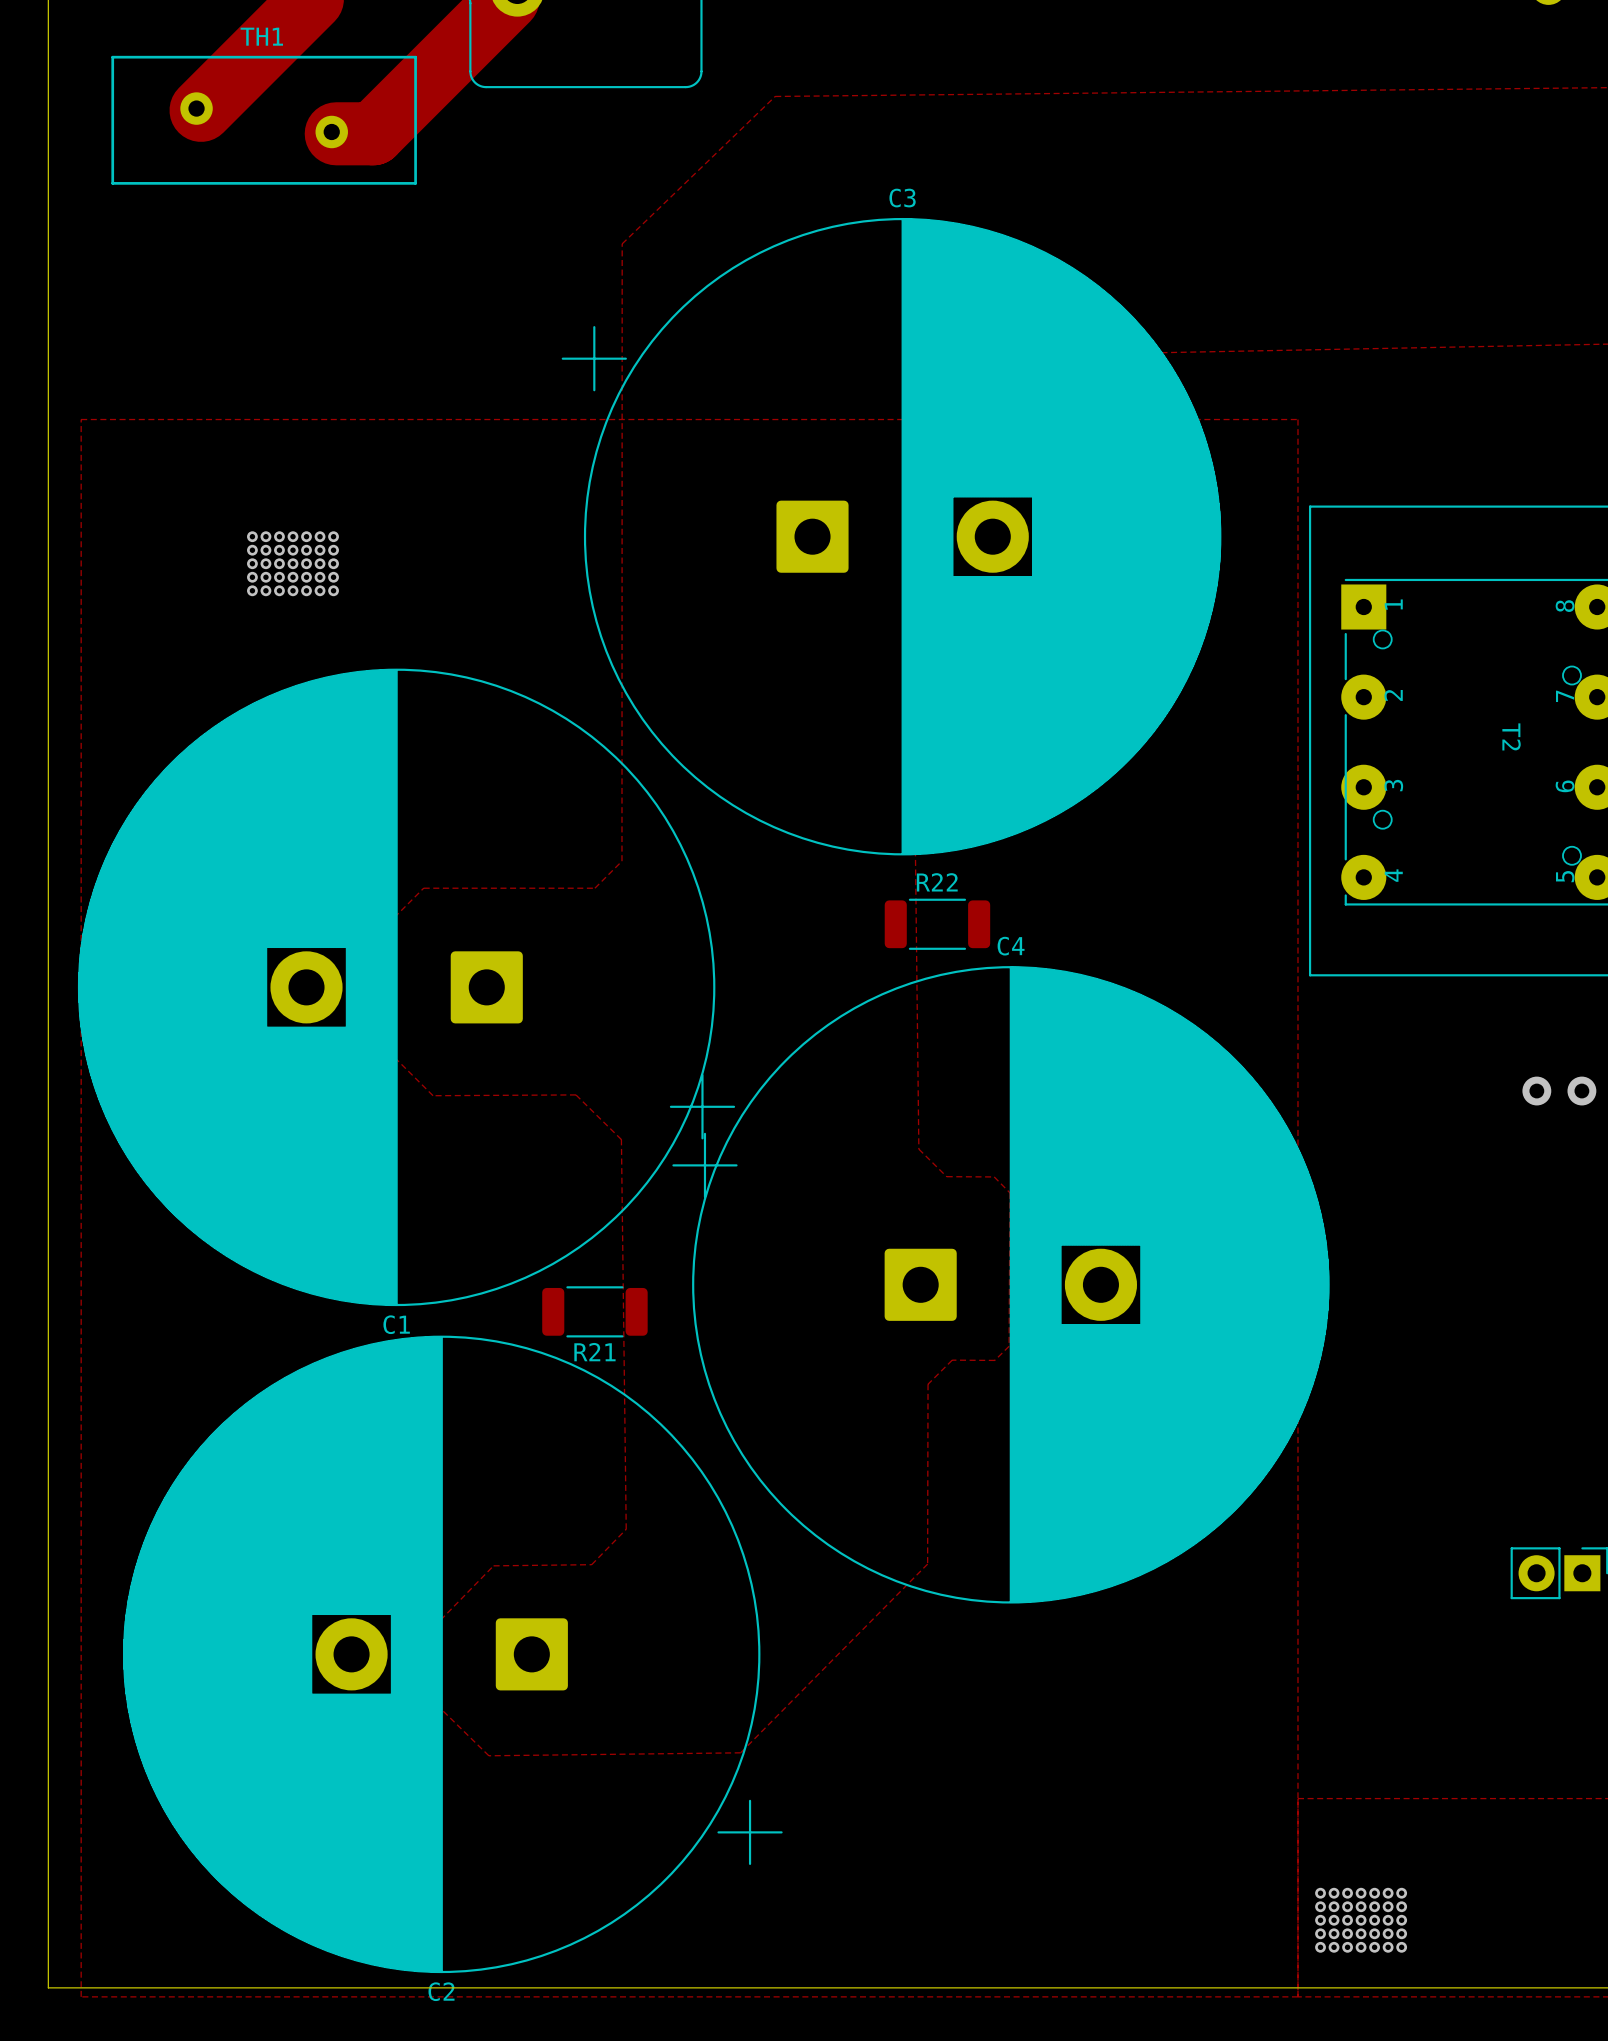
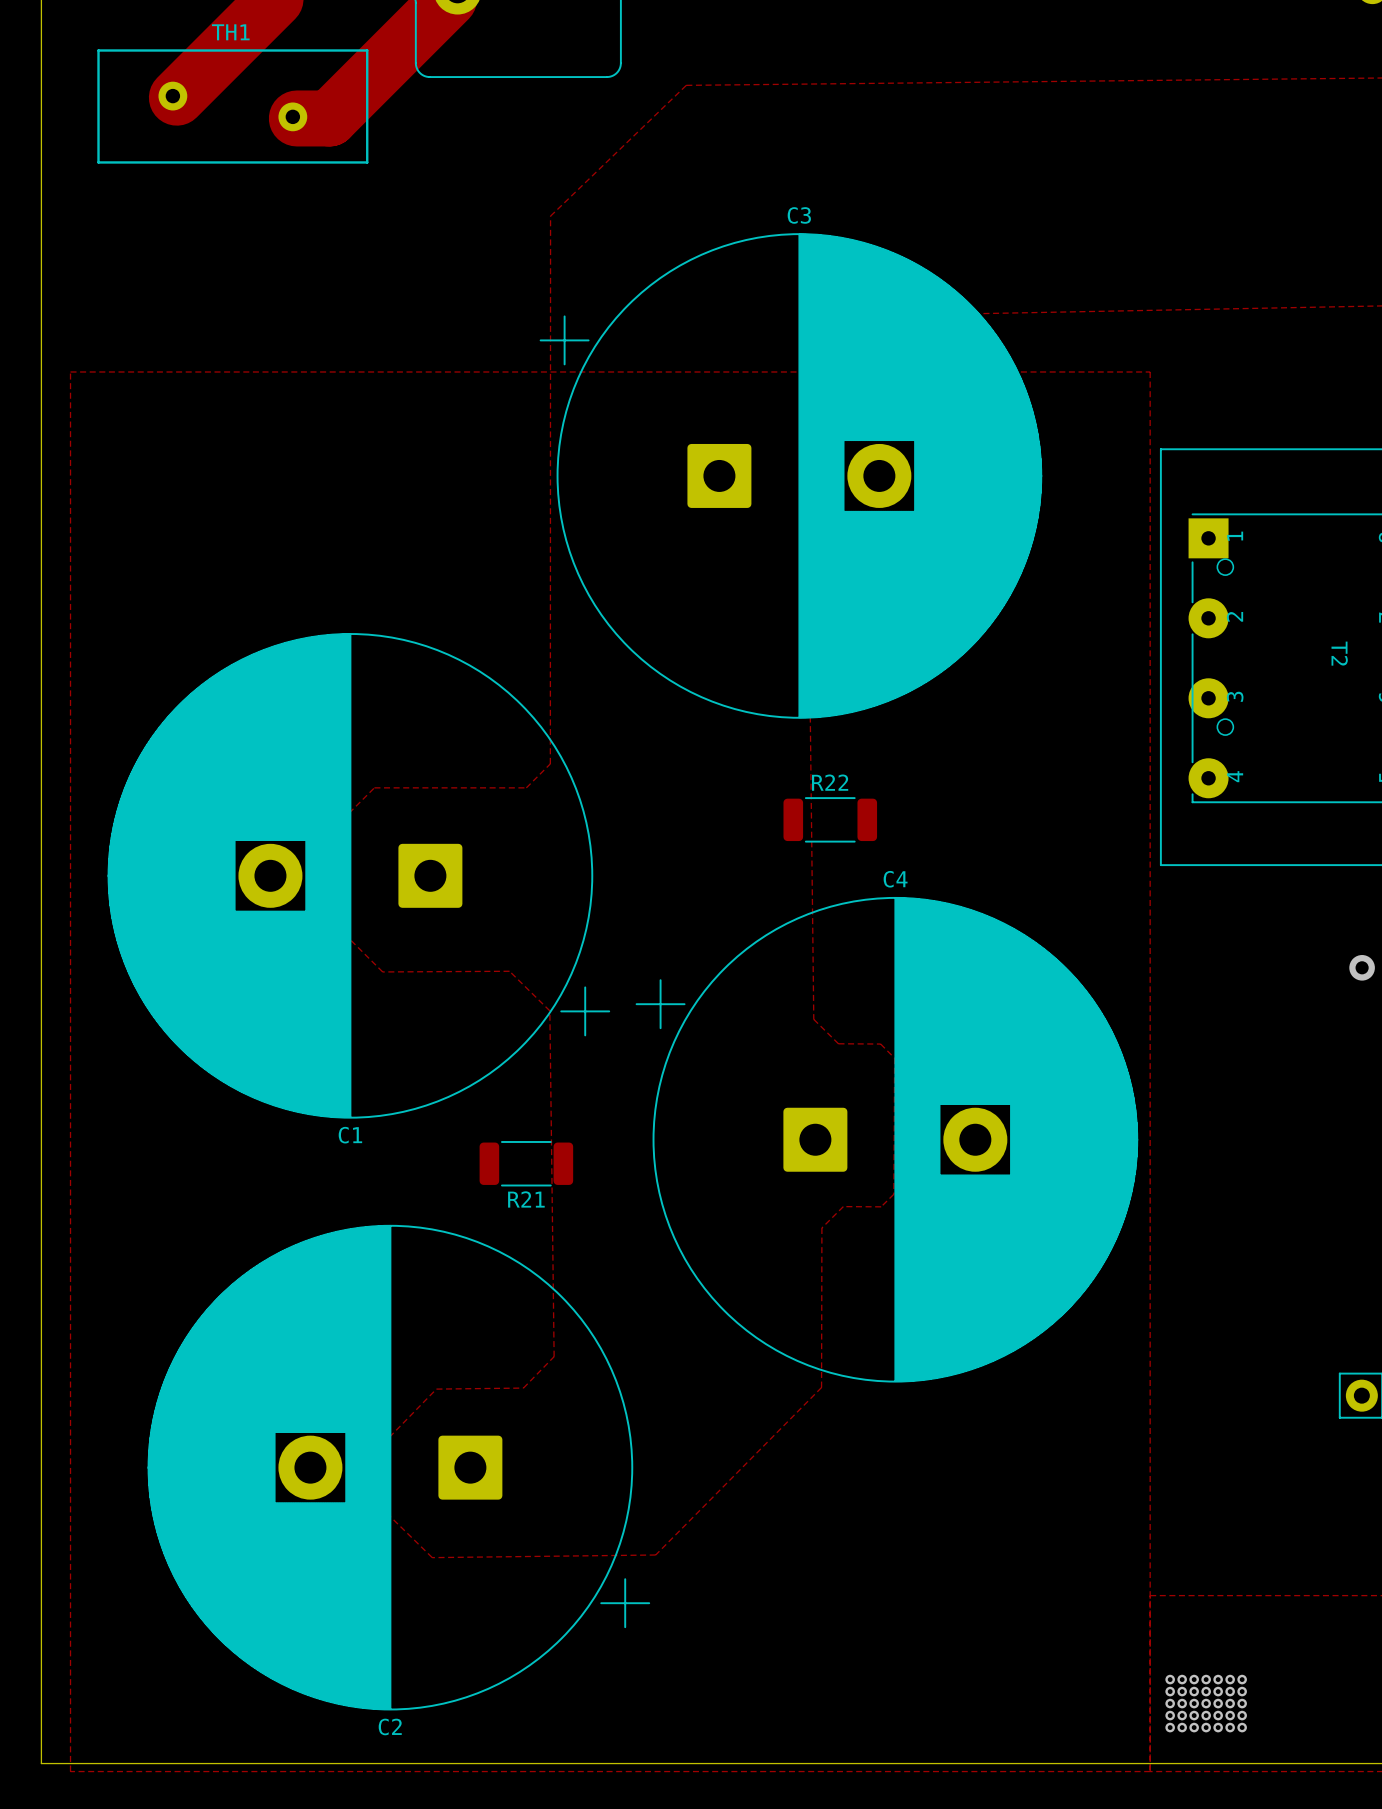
C3 name position: C3 (902, 198) -> C3 (799, 215)
C3 footprint: [561, 217, 1222, 856] -> [539, 233, 1043, 719]
via: (252, 536) -> none
via: (265, 536) -> none
via: (279, 536) -> none
via: (292, 536) -> none
via: (306, 536) -> none
via: (320, 536) -> none
via: (333, 536) -> none
via: (252, 550) -> none
via: (265, 550) -> none
via: (279, 550) -> none
via: (292, 550) -> none
via: (306, 550) -> none
via: (320, 550) -> none
via: (333, 550) -> none
via: (252, 563) -> none
via: (265, 563) -> none
via: (279, 563) -> none
via: (292, 563) -> none
via: (306, 563) -> none
via: (320, 563) -> none
via: (333, 563) -> none
via: (252, 577) -> none
via: (265, 577) -> none
via: (279, 577) -> none
via: (292, 577) -> none
via: (306, 577) -> none
via: (320, 577) -> none
via: (333, 577) -> none
via: (252, 590) -> none
via: (265, 590) -> none
via: (279, 590) -> none
via: (292, 590) -> none
via: (306, 590) -> none
via: (320, 590) -> none
via: (333, 590) -> none
C1 footprint: [77, 668, 738, 1307] -> [107, 633, 611, 1119]
C4 name position: C4 (1011, 946) -> C4 (895, 879)
C4 footprint: [669, 966, 1330, 1604] -> [635, 896, 1139, 1383]
C1 name position: C1 (396, 1324) -> C1 (350, 1135)
C2 footprint: [122, 1335, 783, 1974] -> [147, 1224, 651, 1711]
C2 name position: C2 (441, 1991) -> C2 (390, 1726)

